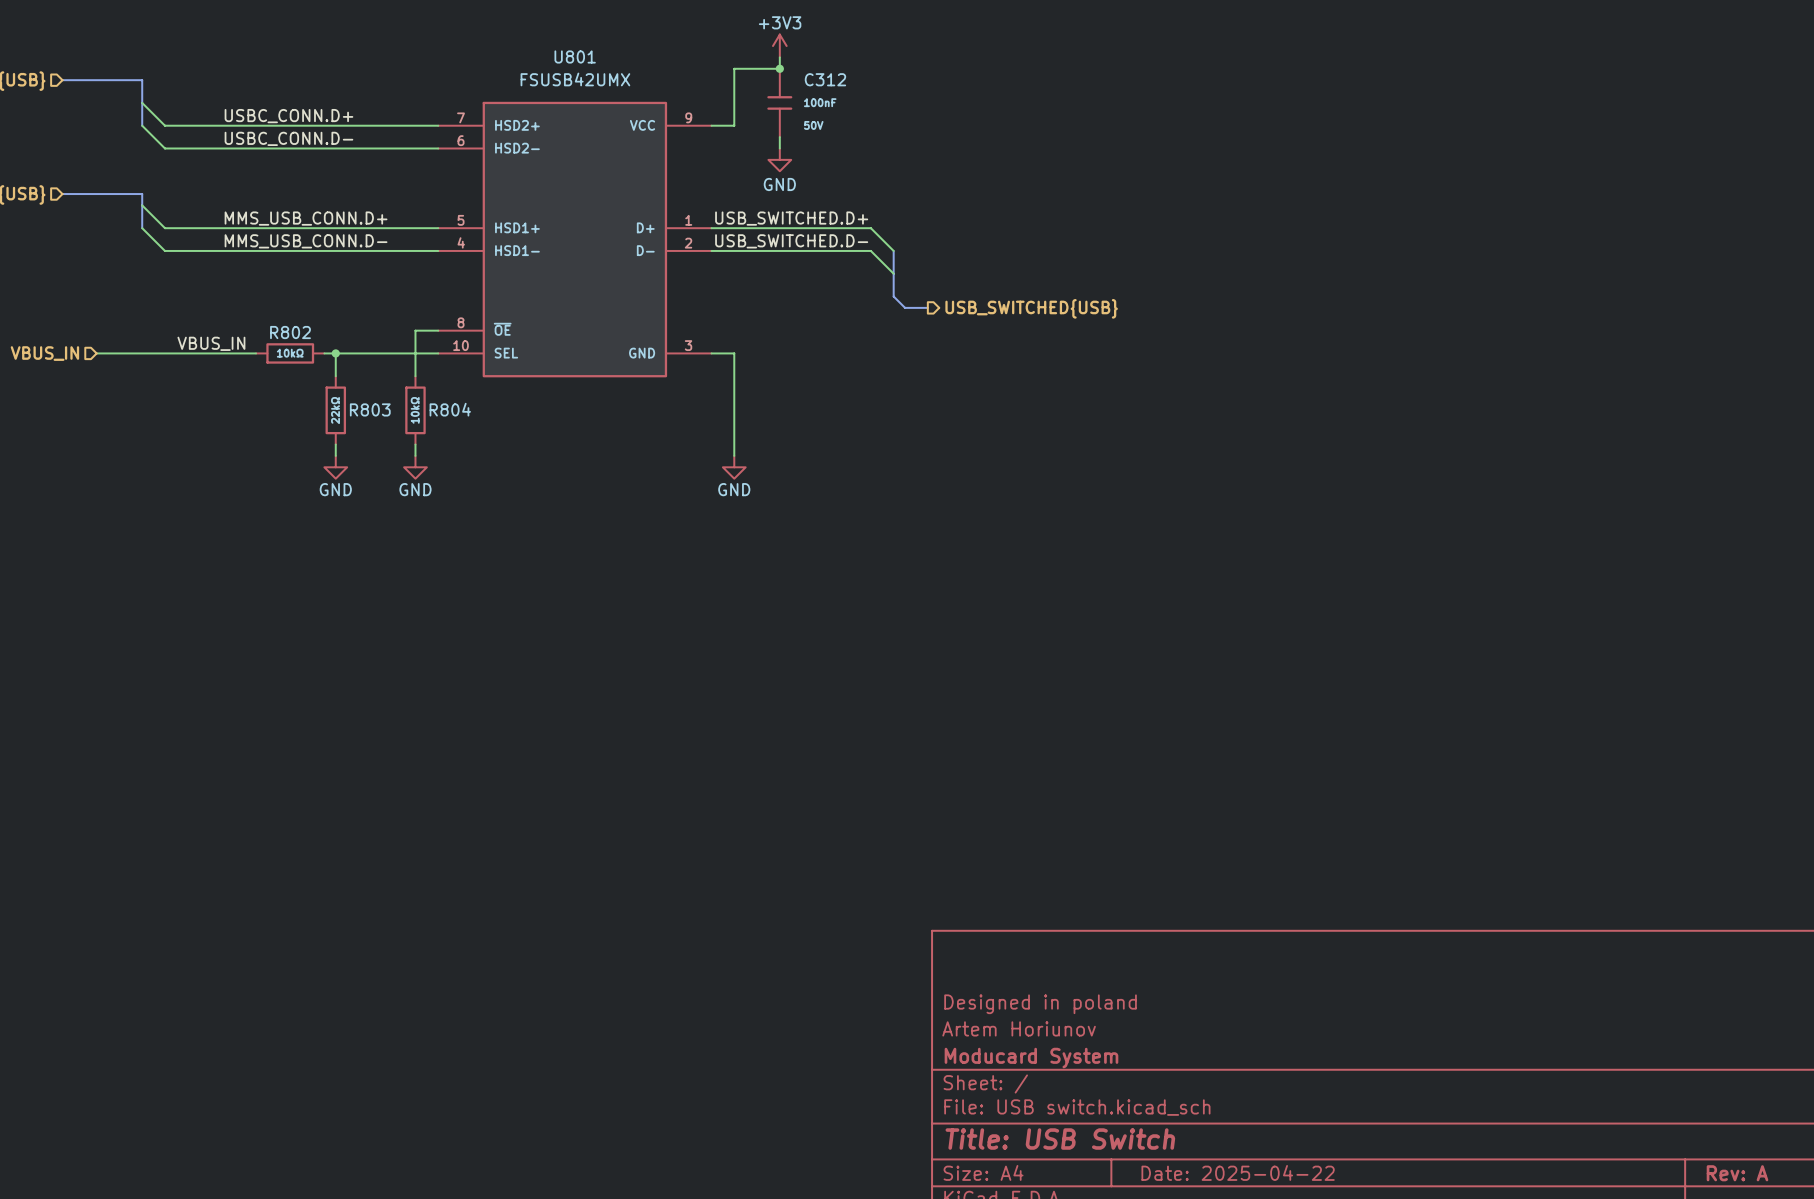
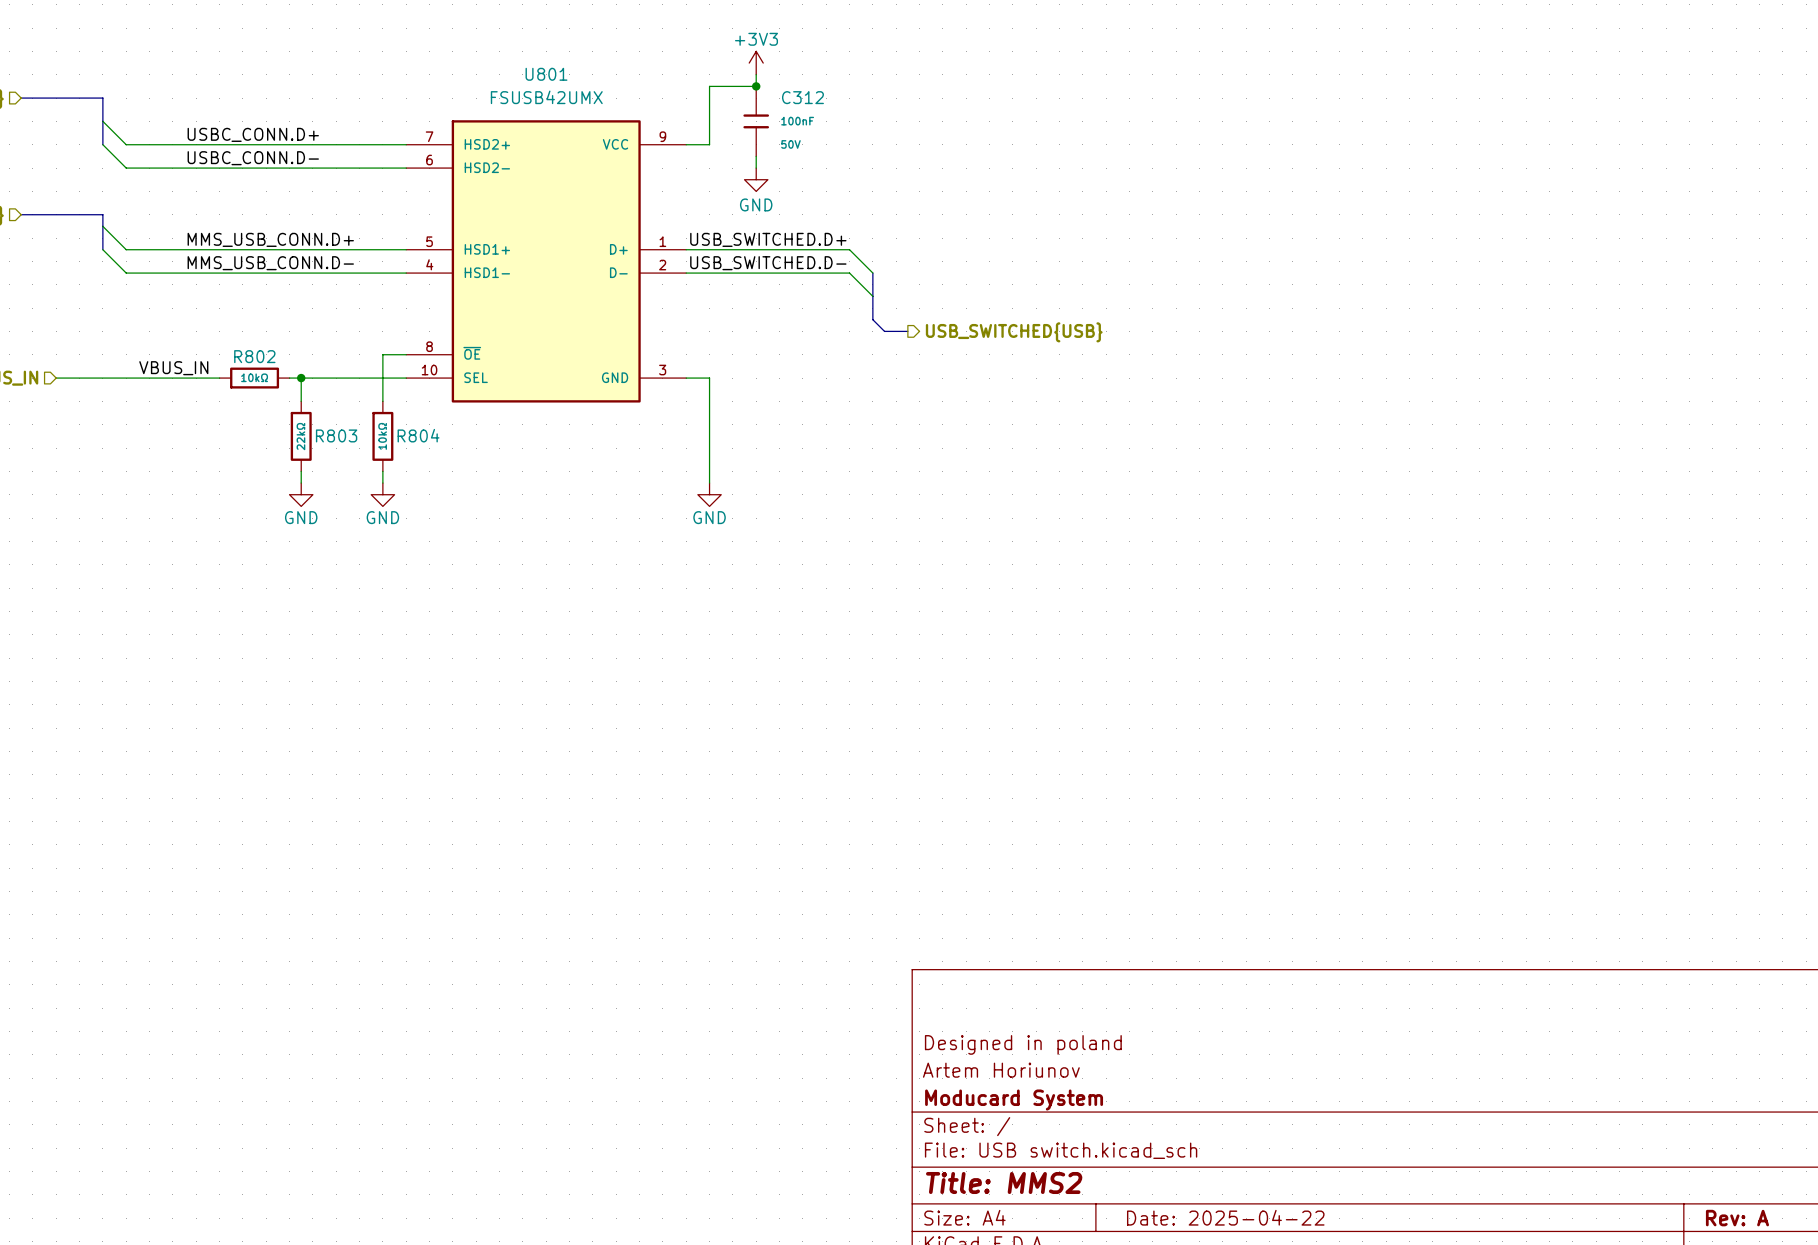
title block: Title: USB Switch (1060, 1139) -> Title: MMS2 (1004, 1182)

